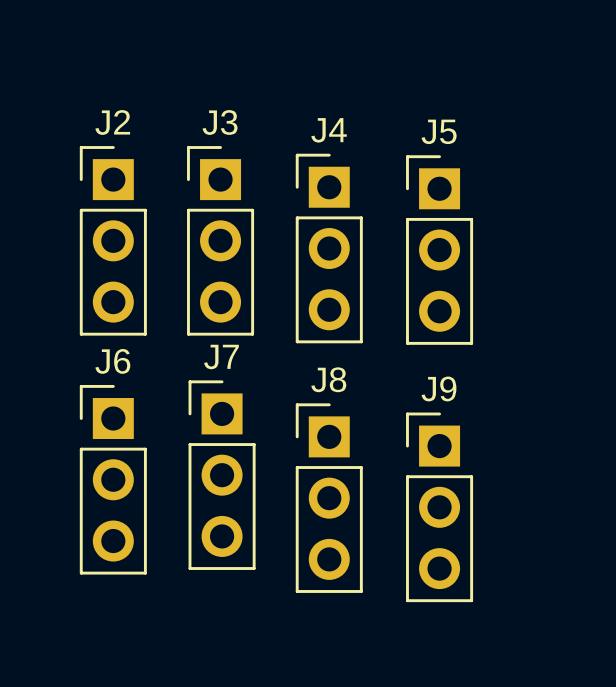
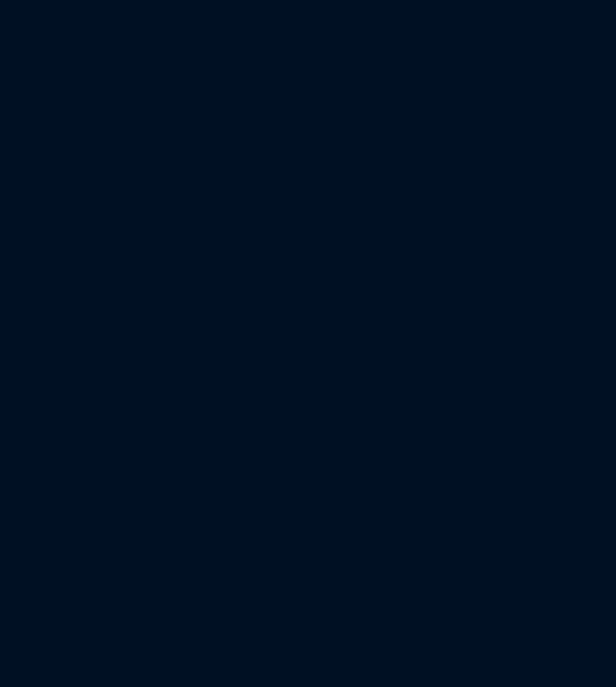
J2: (113, 240) -> none
J3: (220, 240) -> none
J4: (329, 248) -> none
J5: (439, 250) -> none
J7: (222, 475) -> none
J6: (113, 479) -> none
J8: (329, 498) -> none
J9: (439, 507) -> none

